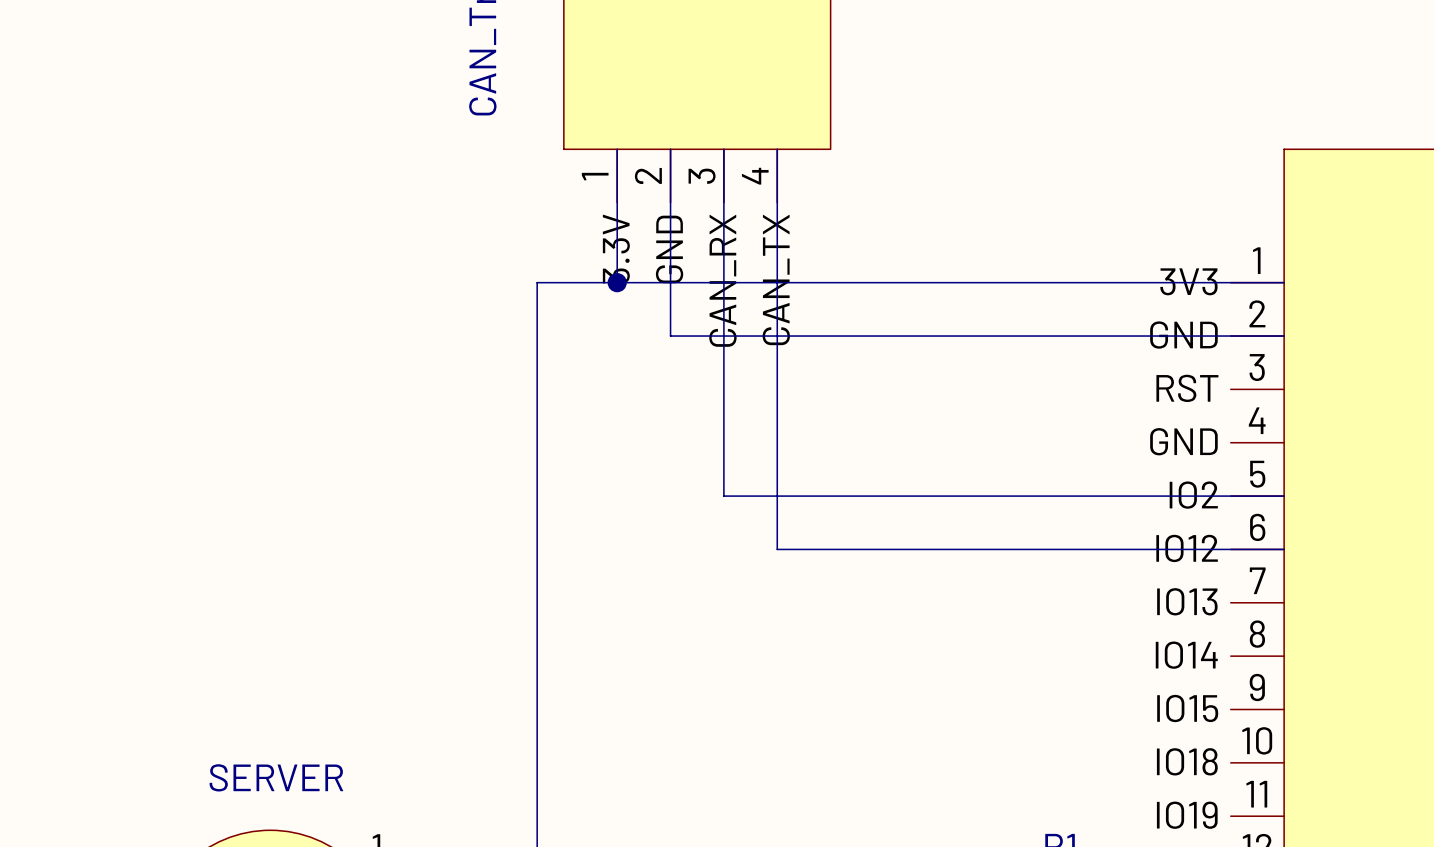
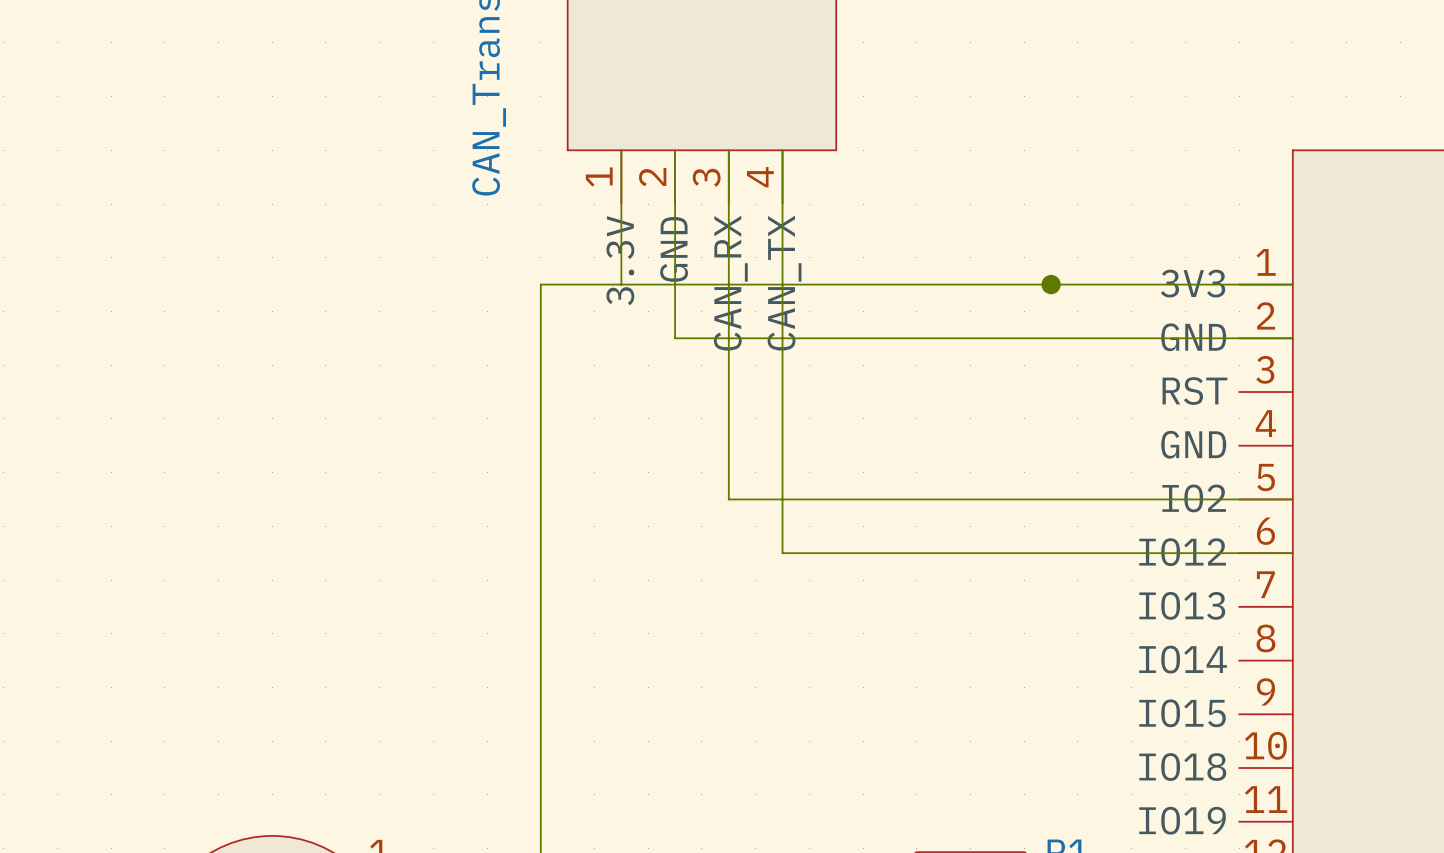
junction: (617, 282) -> none
junction: none -> (1051, 284)
part value: SERVER (276, 777) -> none

